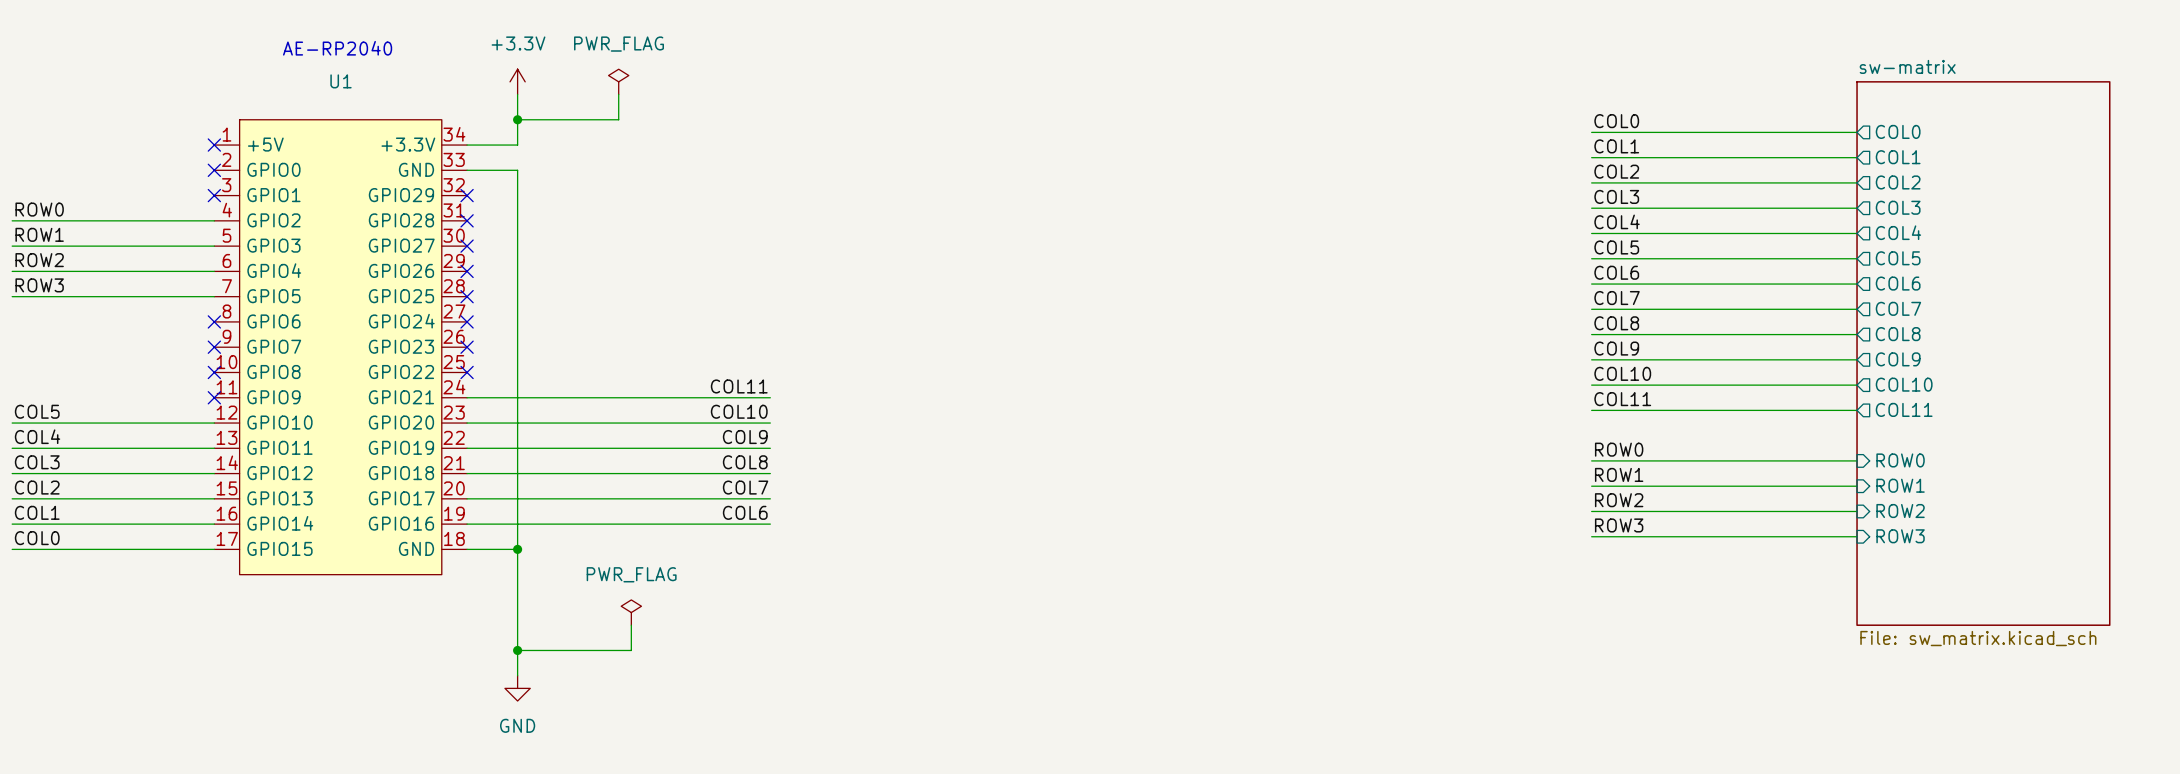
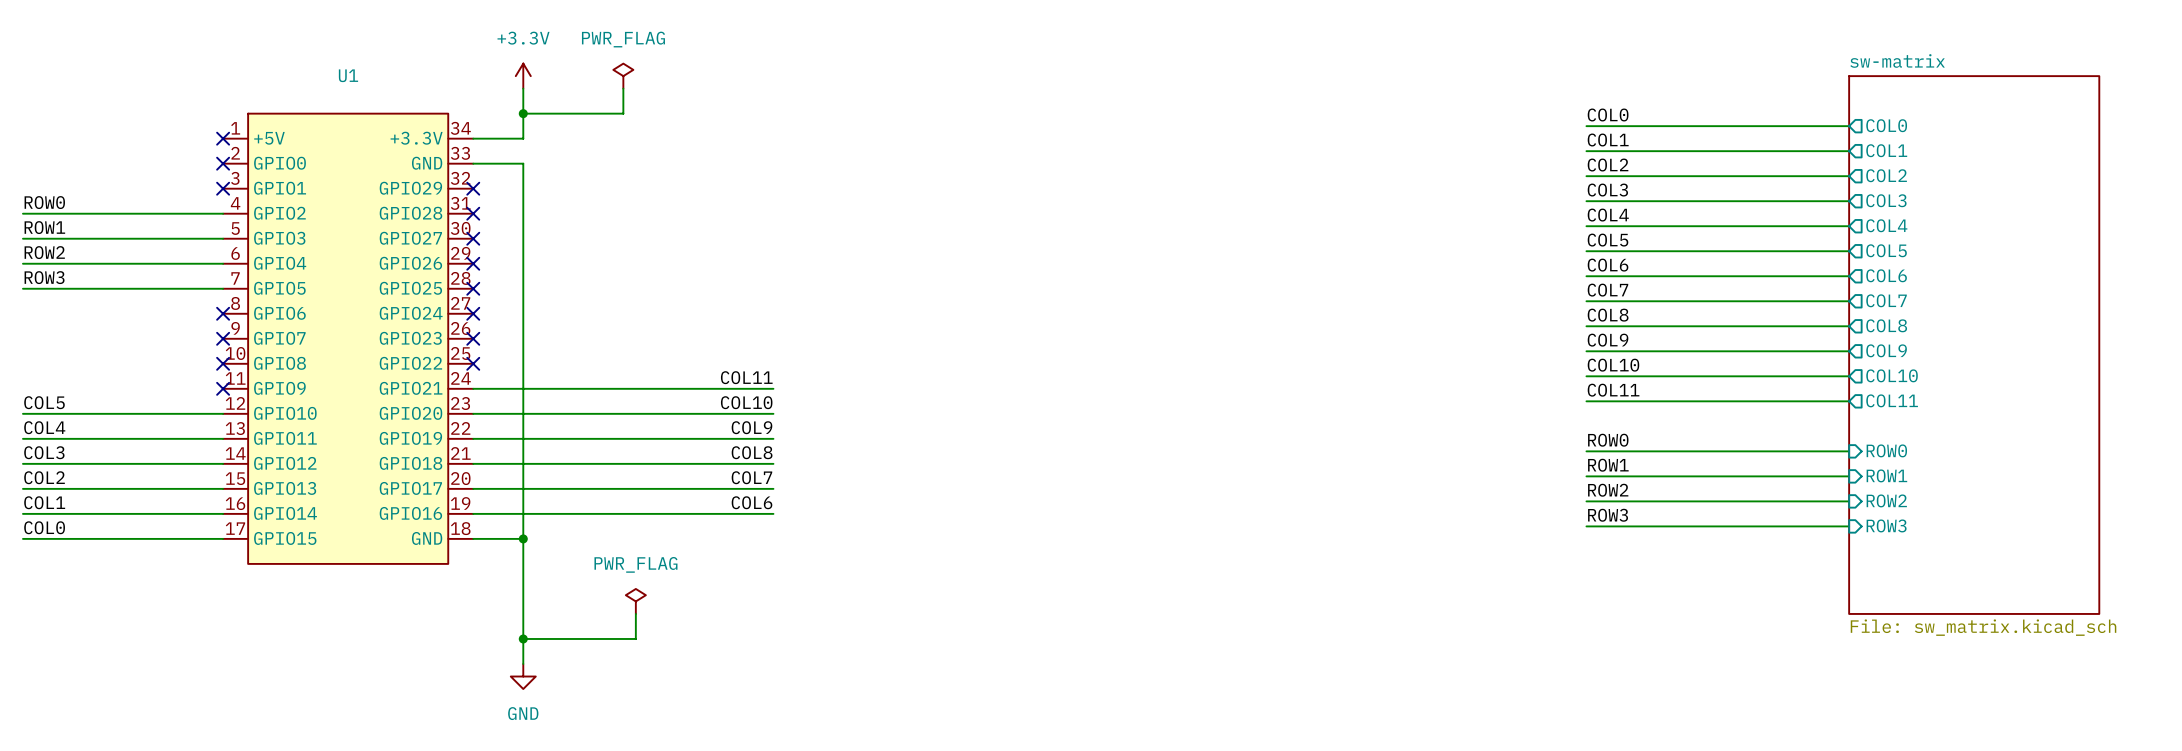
text: AE-RP2040 (337, 48) -> none

